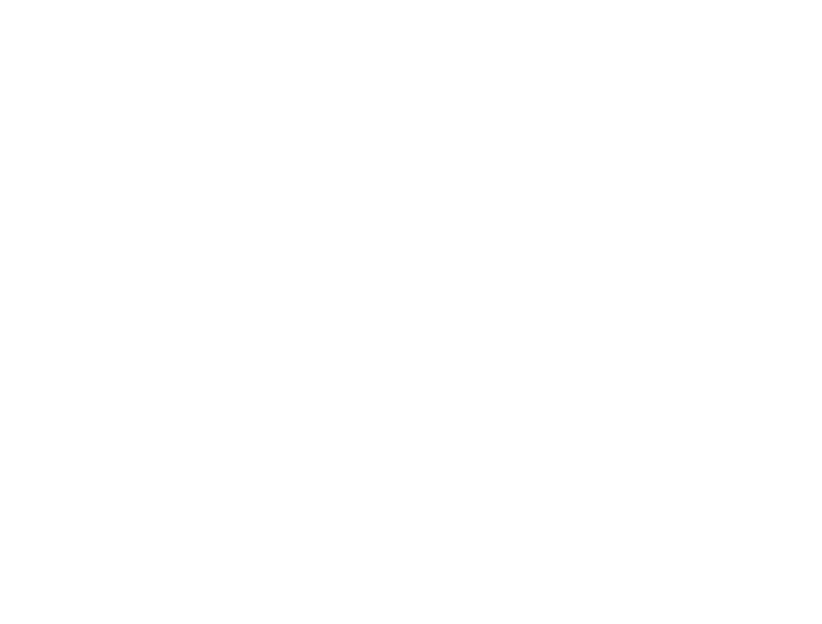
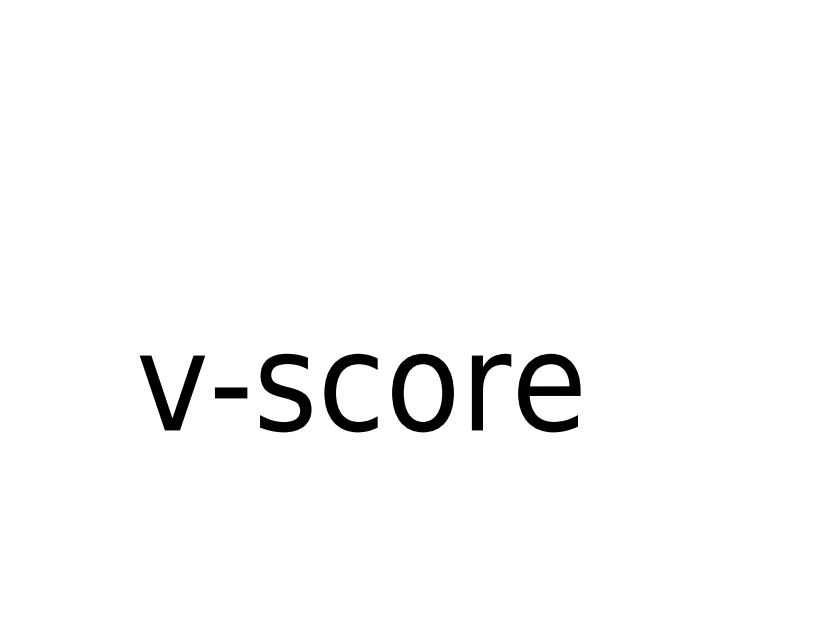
text: none -> v-score (360, 393)

